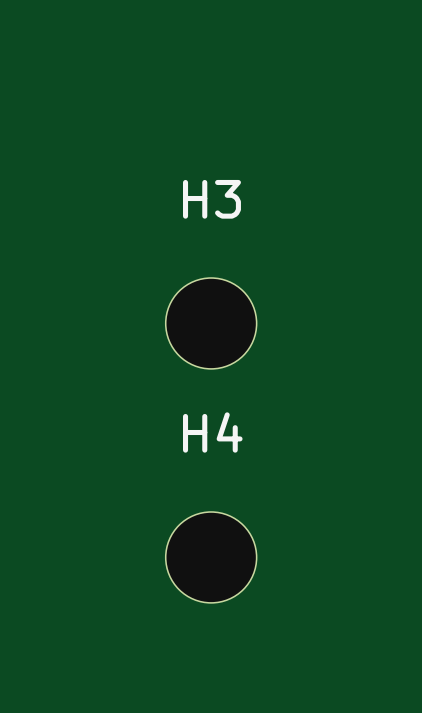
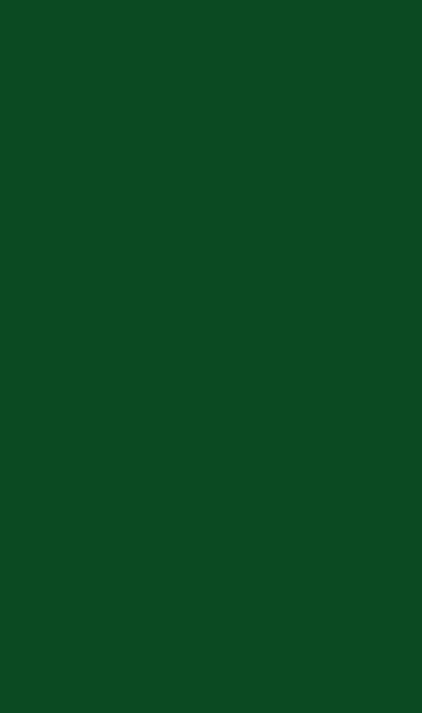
H3: (211, 323) -> none
H4: (211, 557) -> none

